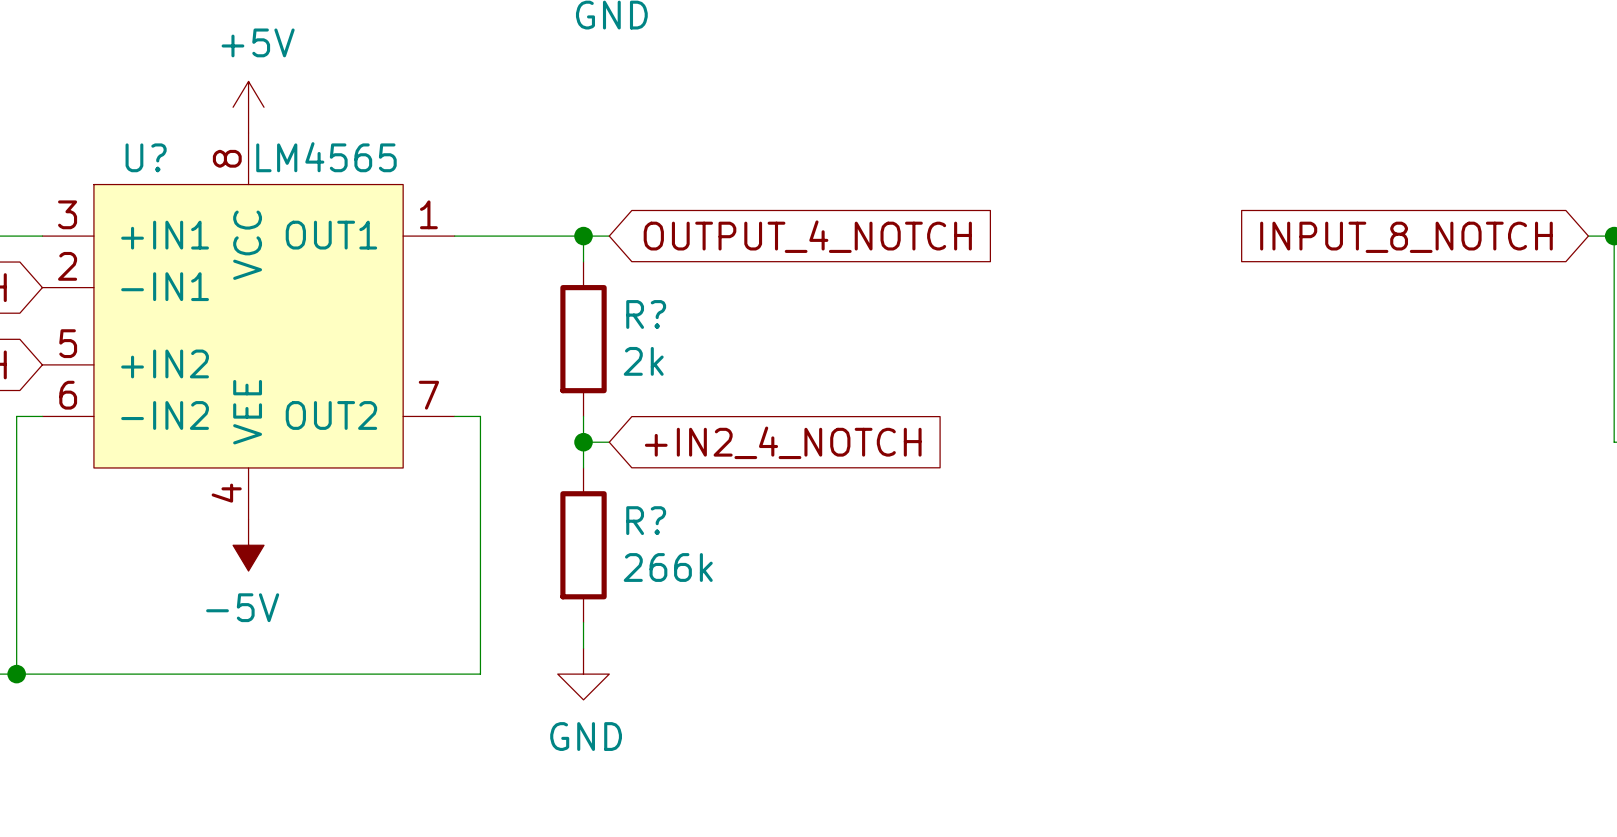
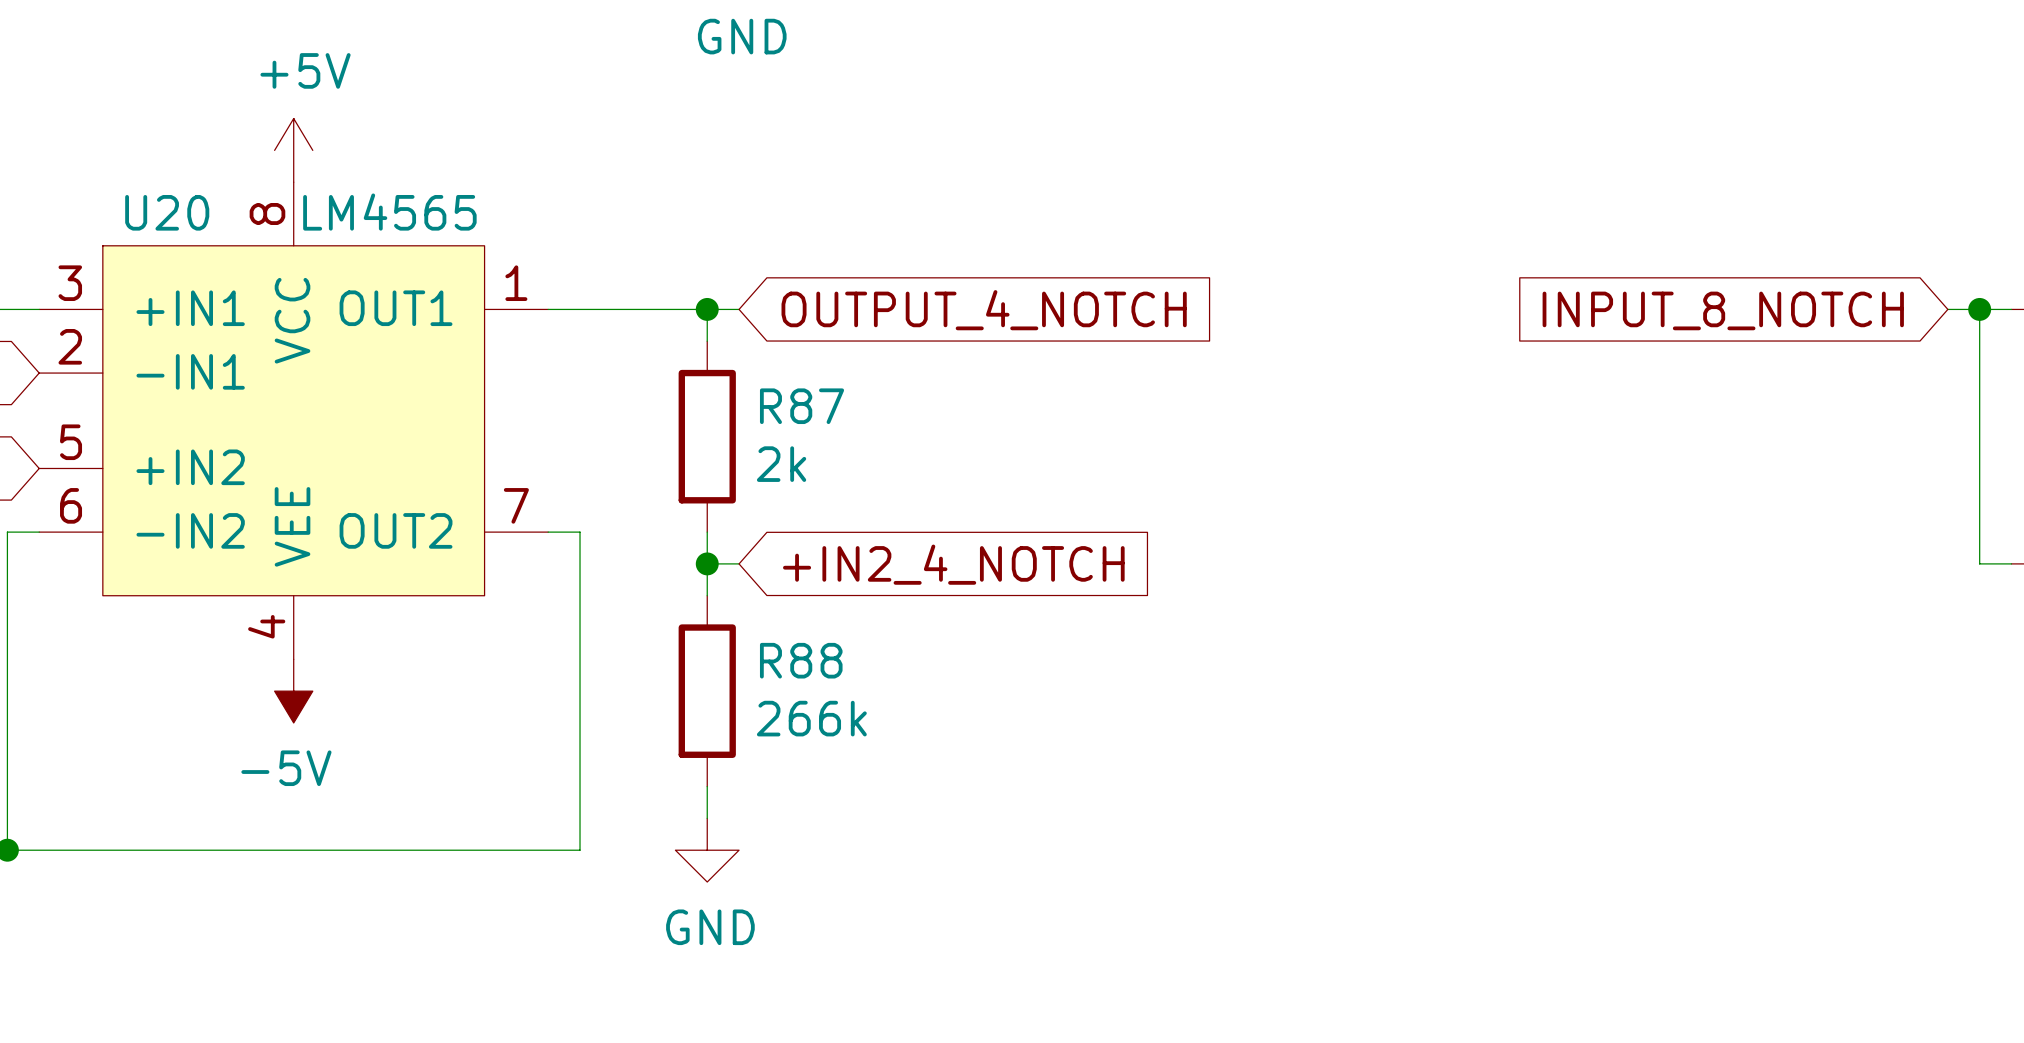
U? name: U? (146, 157) -> U20 (167, 212)
R? name: R? (646, 314) -> R87 (802, 406)
R? name: R? (646, 520) -> R88 (801, 660)

